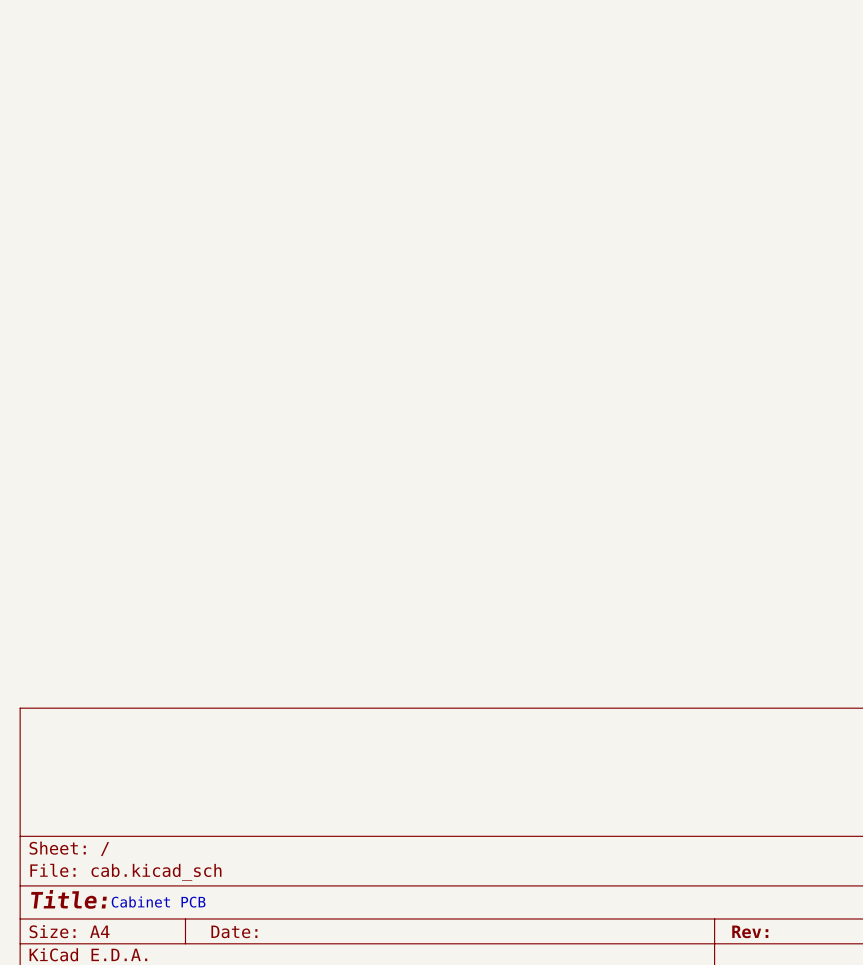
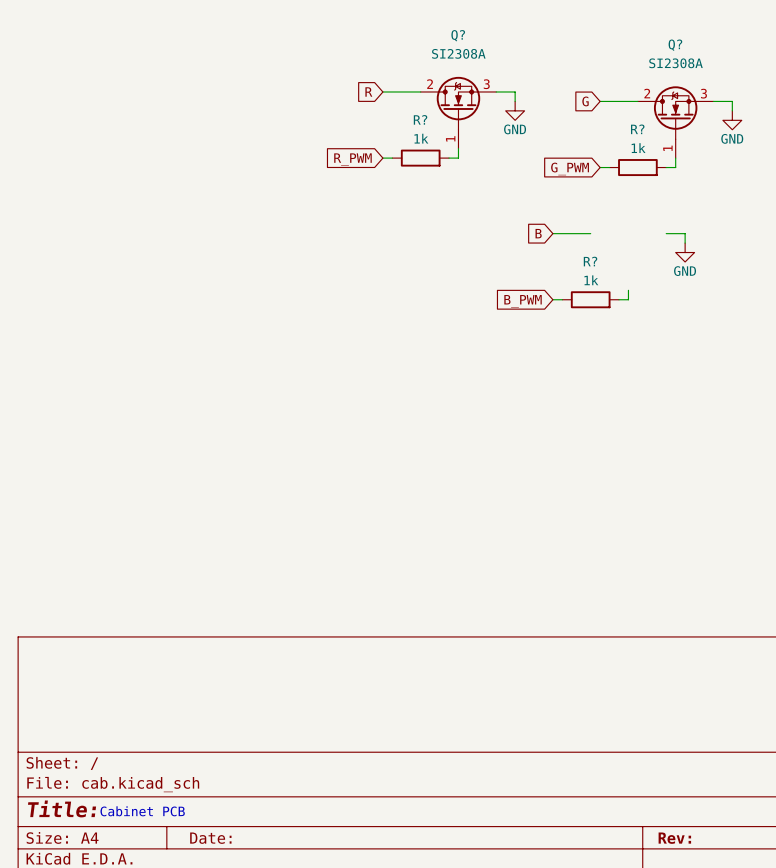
global label: none -> R (368, 91)
wire: none -> (382, 91) (420, 91)
wire: none -> (496, 91) (515, 91) (515, 101)
global label: none -> G (585, 101)
wire: none -> (600, 101) (637, 101)
wire: none -> (713, 101) (732, 101) (732, 110)
power symbol: none -> GND (515, 110)
Q?: none -> SI2308A (458, 112)
power symbol: none -> GND (732, 120)
Q?: none -> SI2308A (675, 122)
wire: none -> (458, 148) (458, 158) (449, 158)
wire: none -> (382, 158) (392, 158)
R?: none -> 1k (420, 158)
wire: none -> (675, 158) (675, 167) (666, 167)
global label: none -> R_PWM (352, 159)
wire: none -> (600, 167) (609, 167)
R?: none -> 1k (637, 167)
global label: none -> G_PWM (570, 168)
global label: none -> B (538, 233)
wire: none -> (552, 233) (590, 233)
wire: none -> (666, 233) (685, 233) (685, 243)
power symbol: none -> GND (685, 252)
wire: none -> (628, 290) (628, 299) (619, 299)
wire: none -> (552, 299) (562, 299)
R?: none -> 1k (590, 299)
global label: none -> B_PWM (523, 301)

